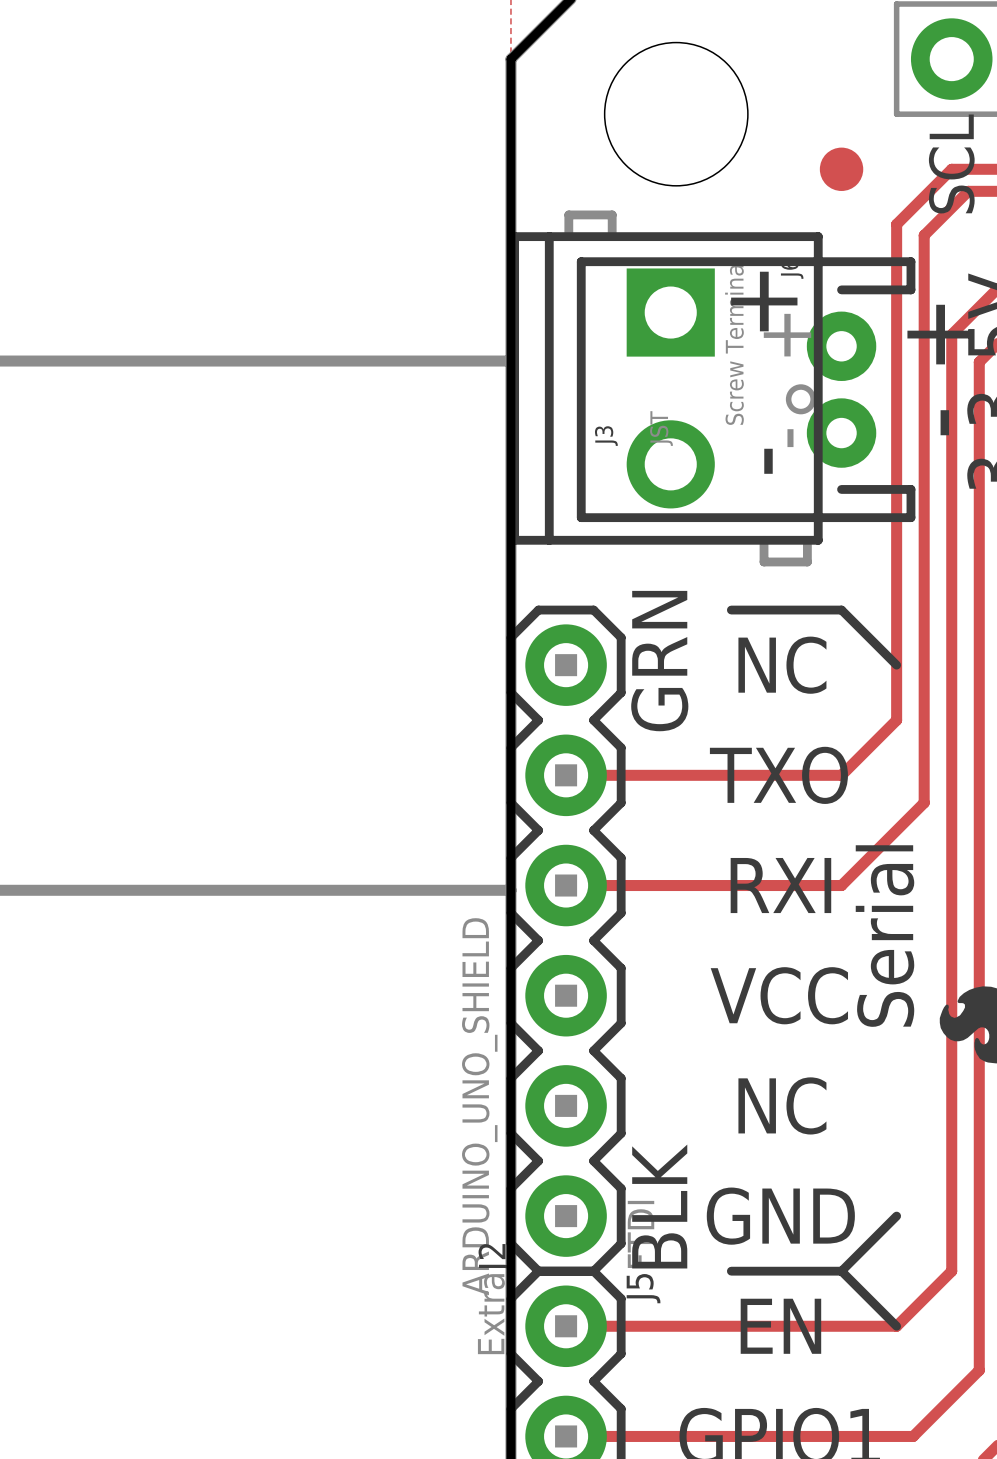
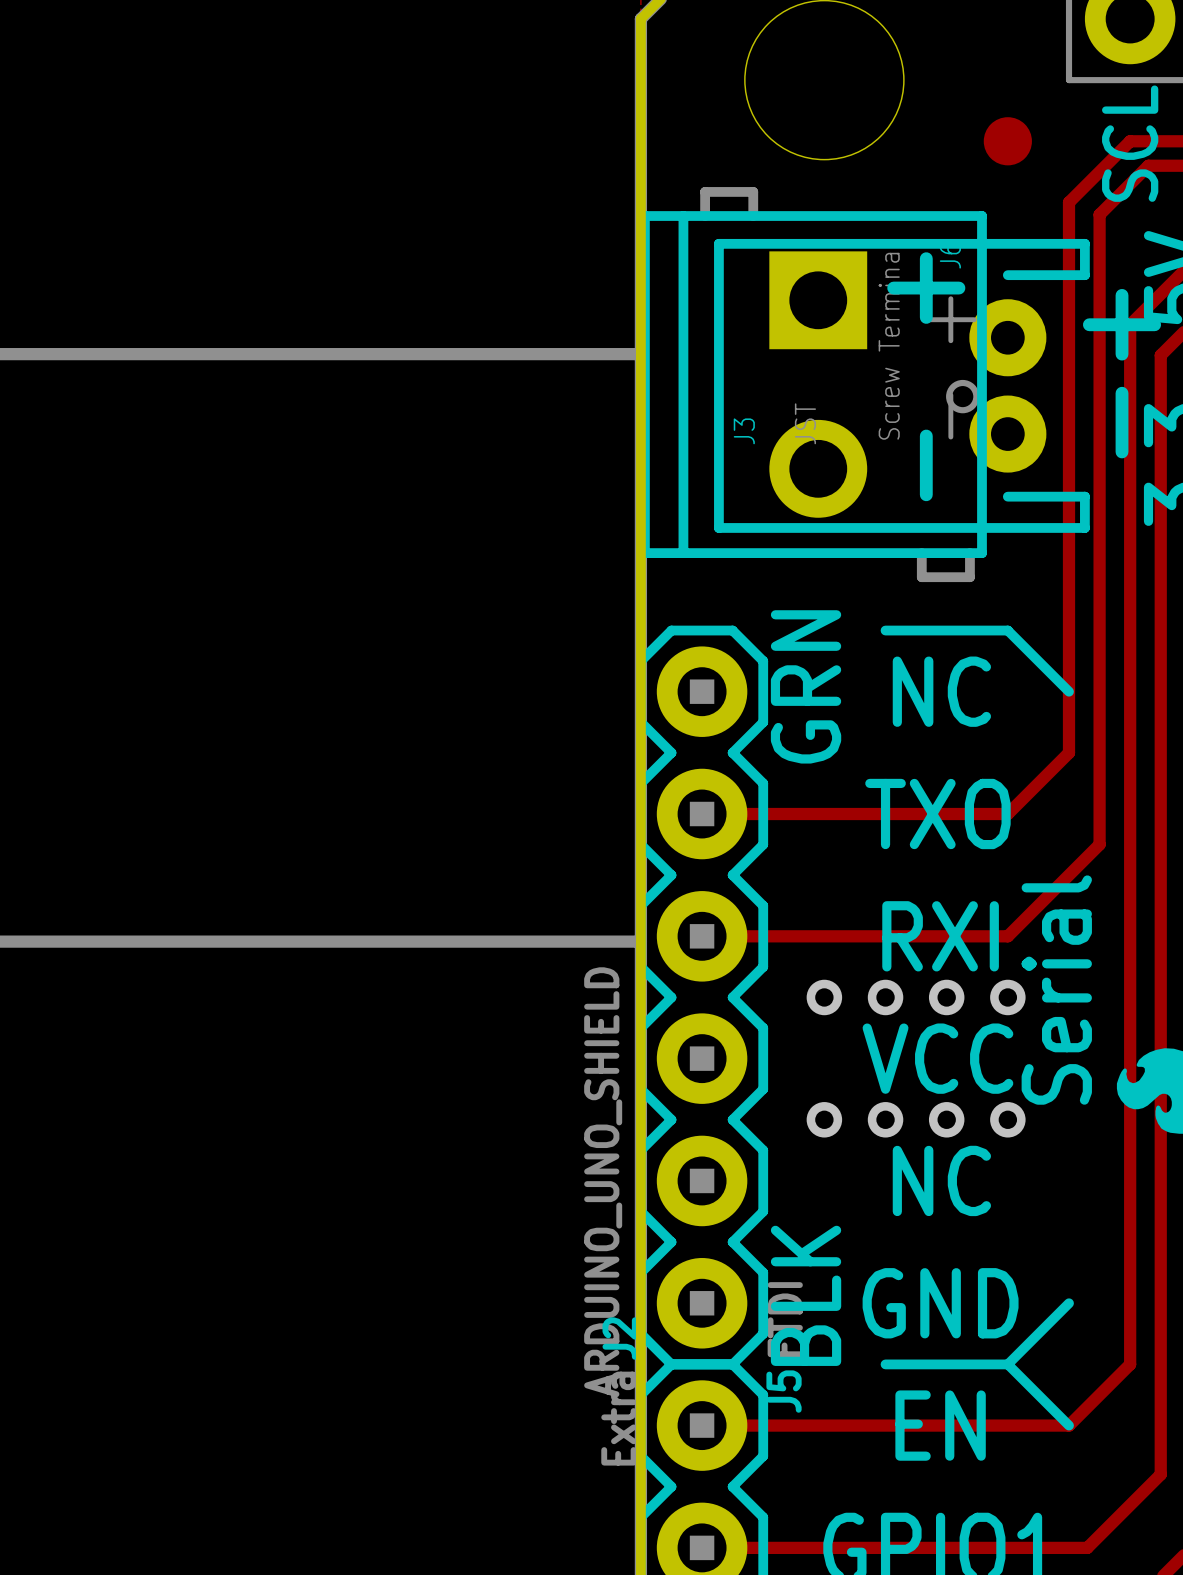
via: none -> (824, 997)
via: none -> (885, 997)
via: none -> (946, 997)
via: none -> (1007, 997)
via: none -> (824, 1119)
via: none -> (885, 1119)
via: none -> (946, 1119)
via: none -> (1007, 1119)

